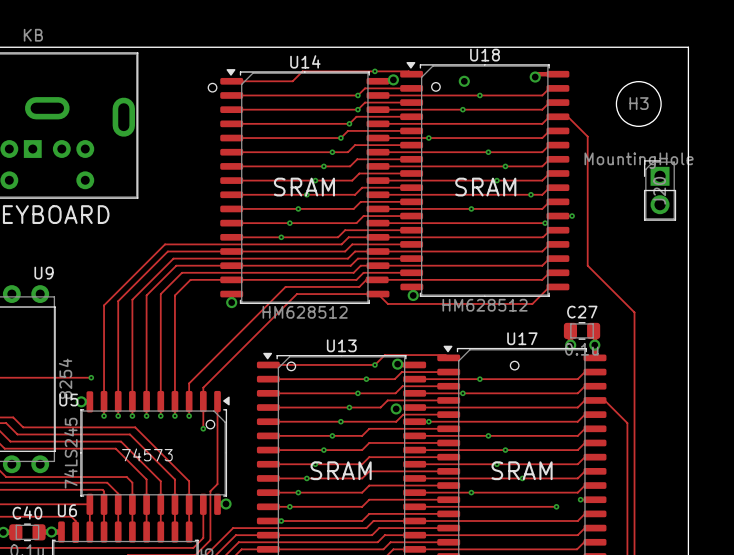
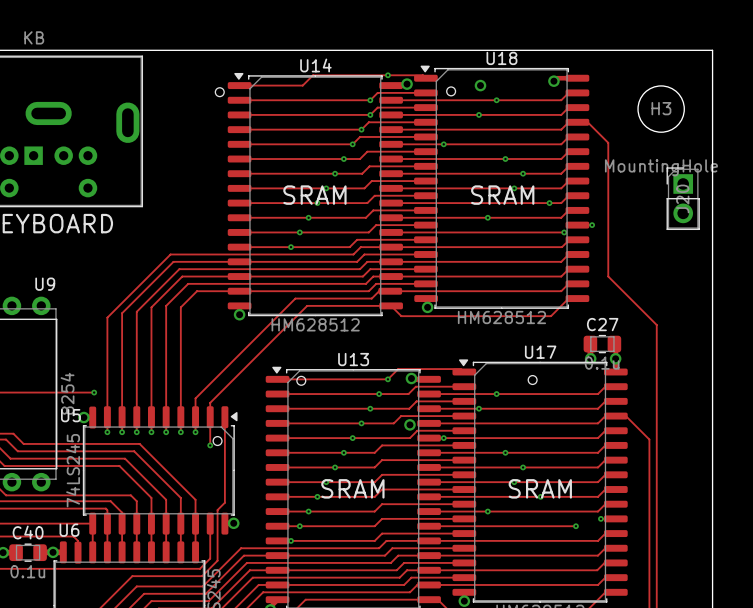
text: 74573 (147, 454) -> none

